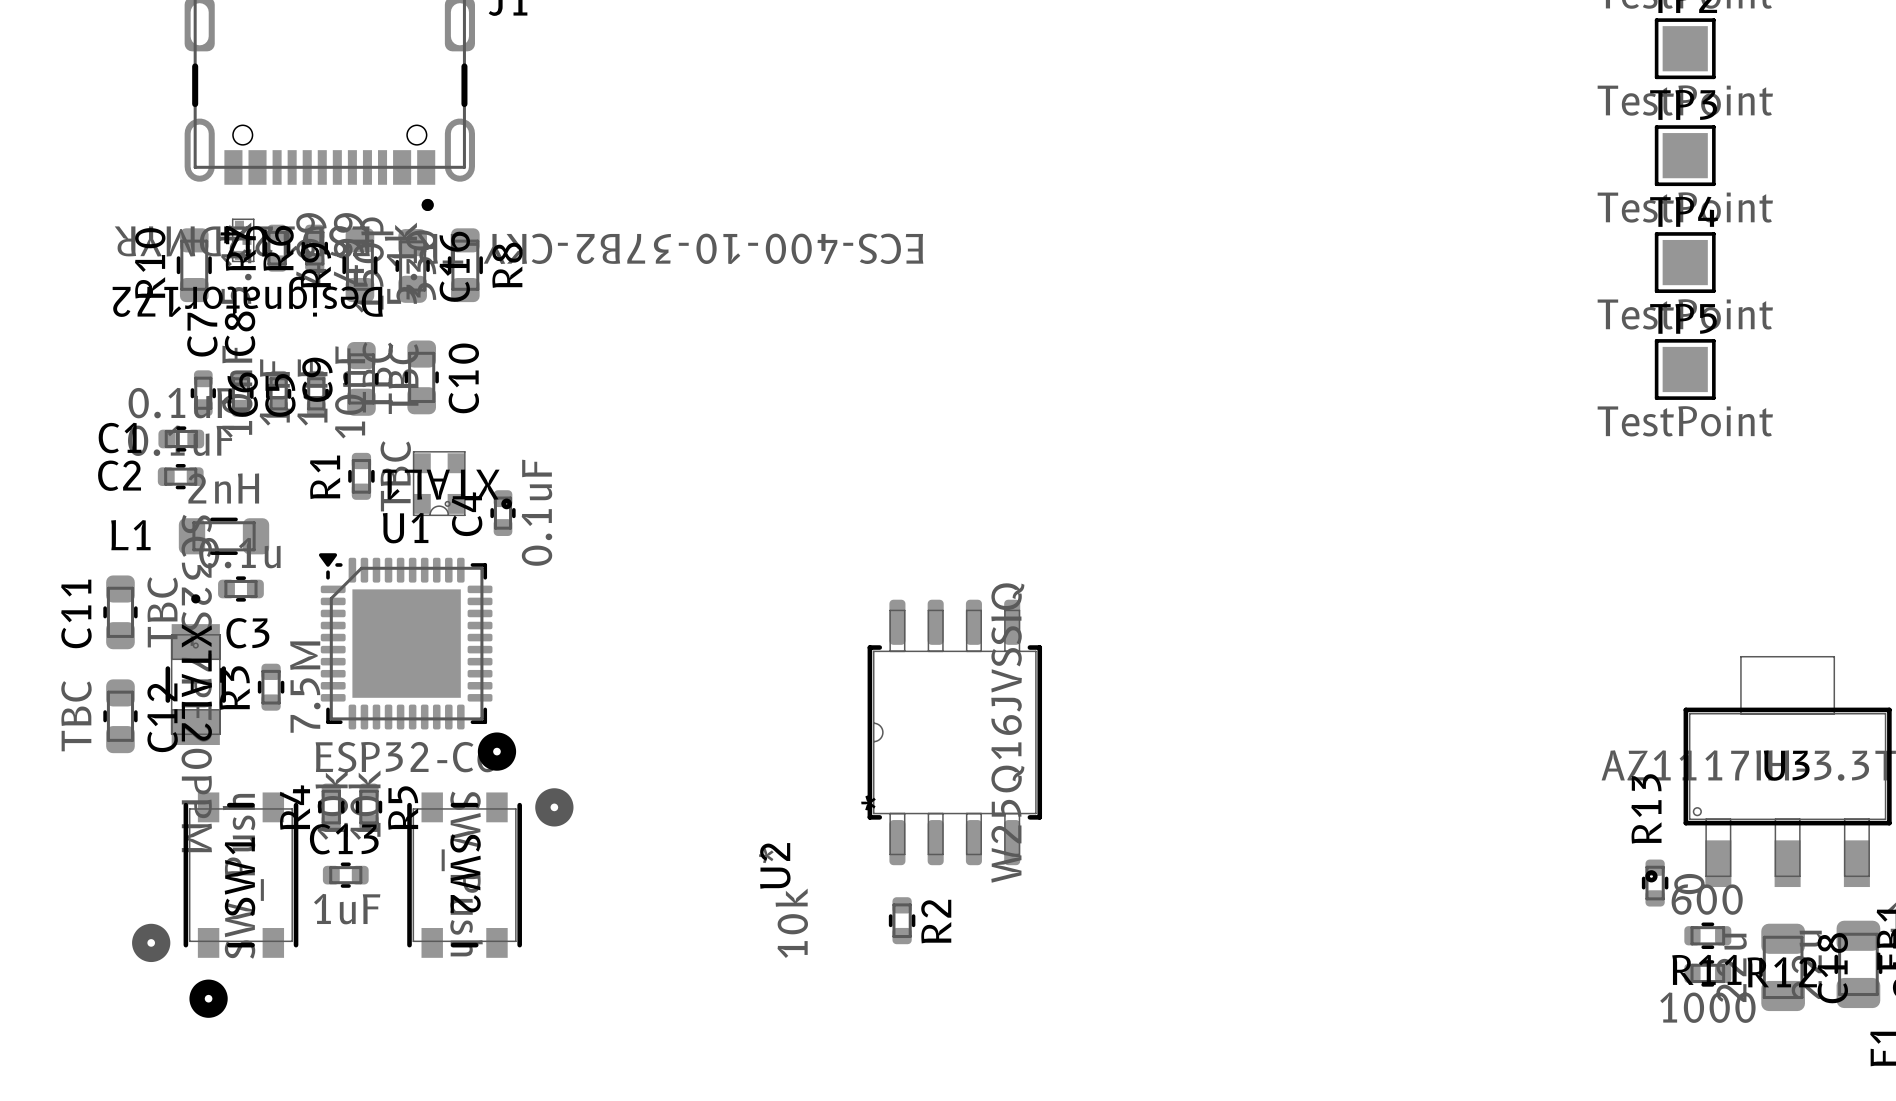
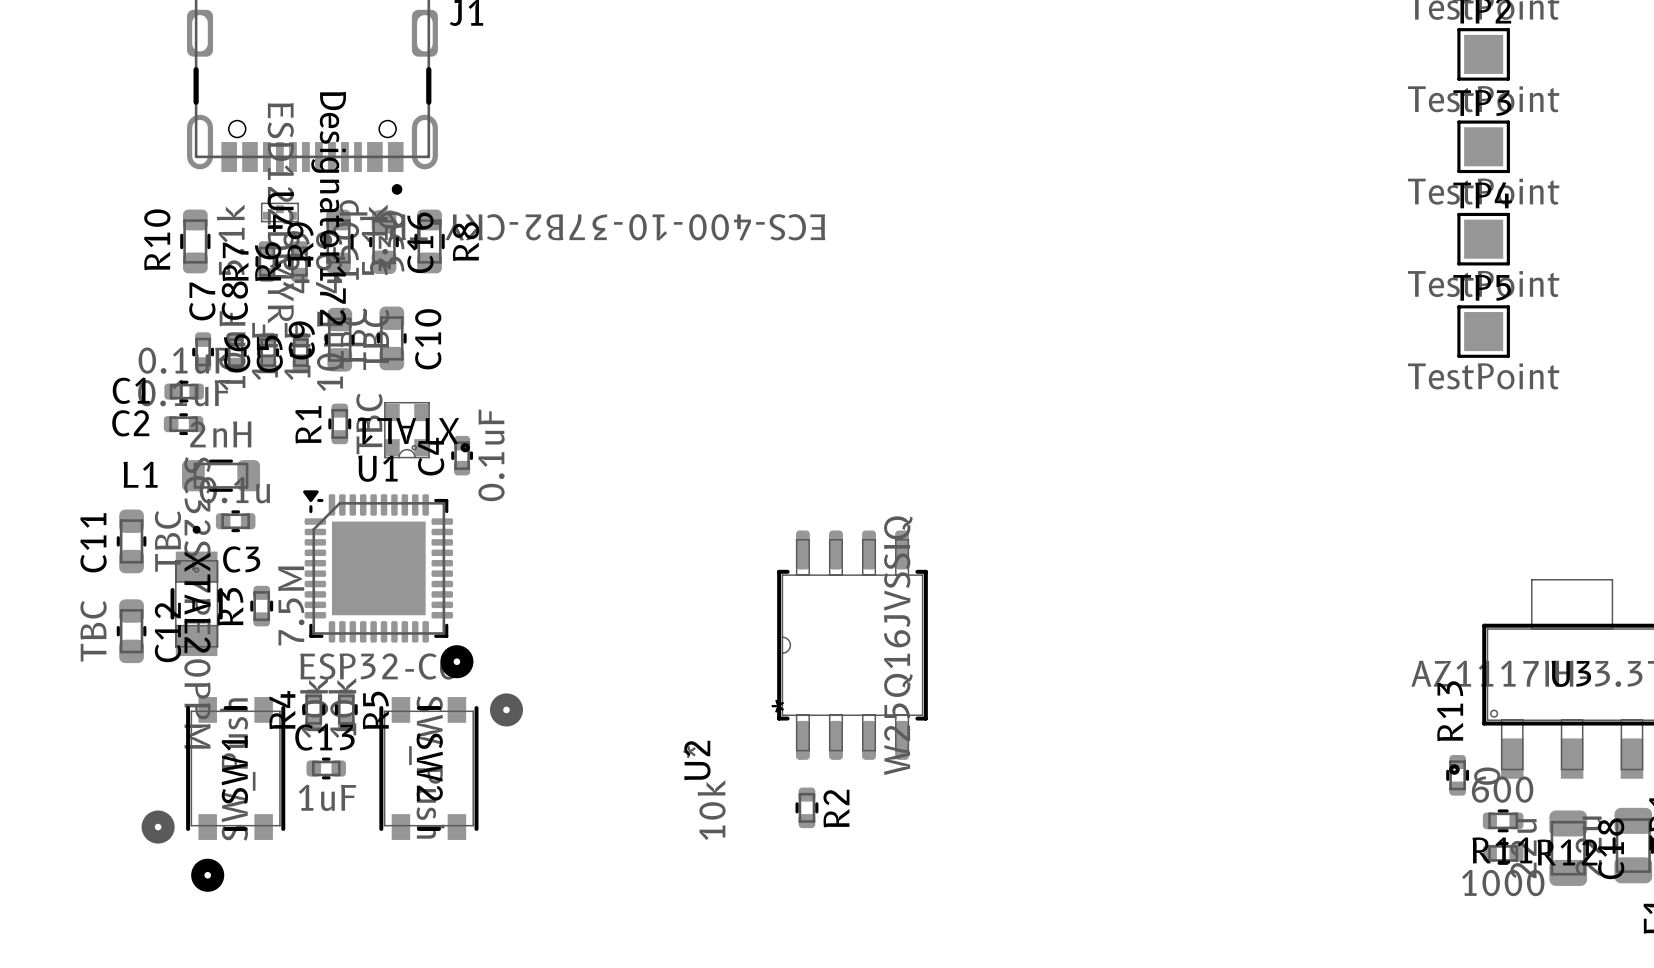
U4 rotation: 0° (243, 240) -> 90° counterclockwise (279, 212)
U4 position: (243, 240) -> (279, 212)
R7 position: (277, 248) -> (266, 261)
R6 position: (314, 248) -> (299, 261)

